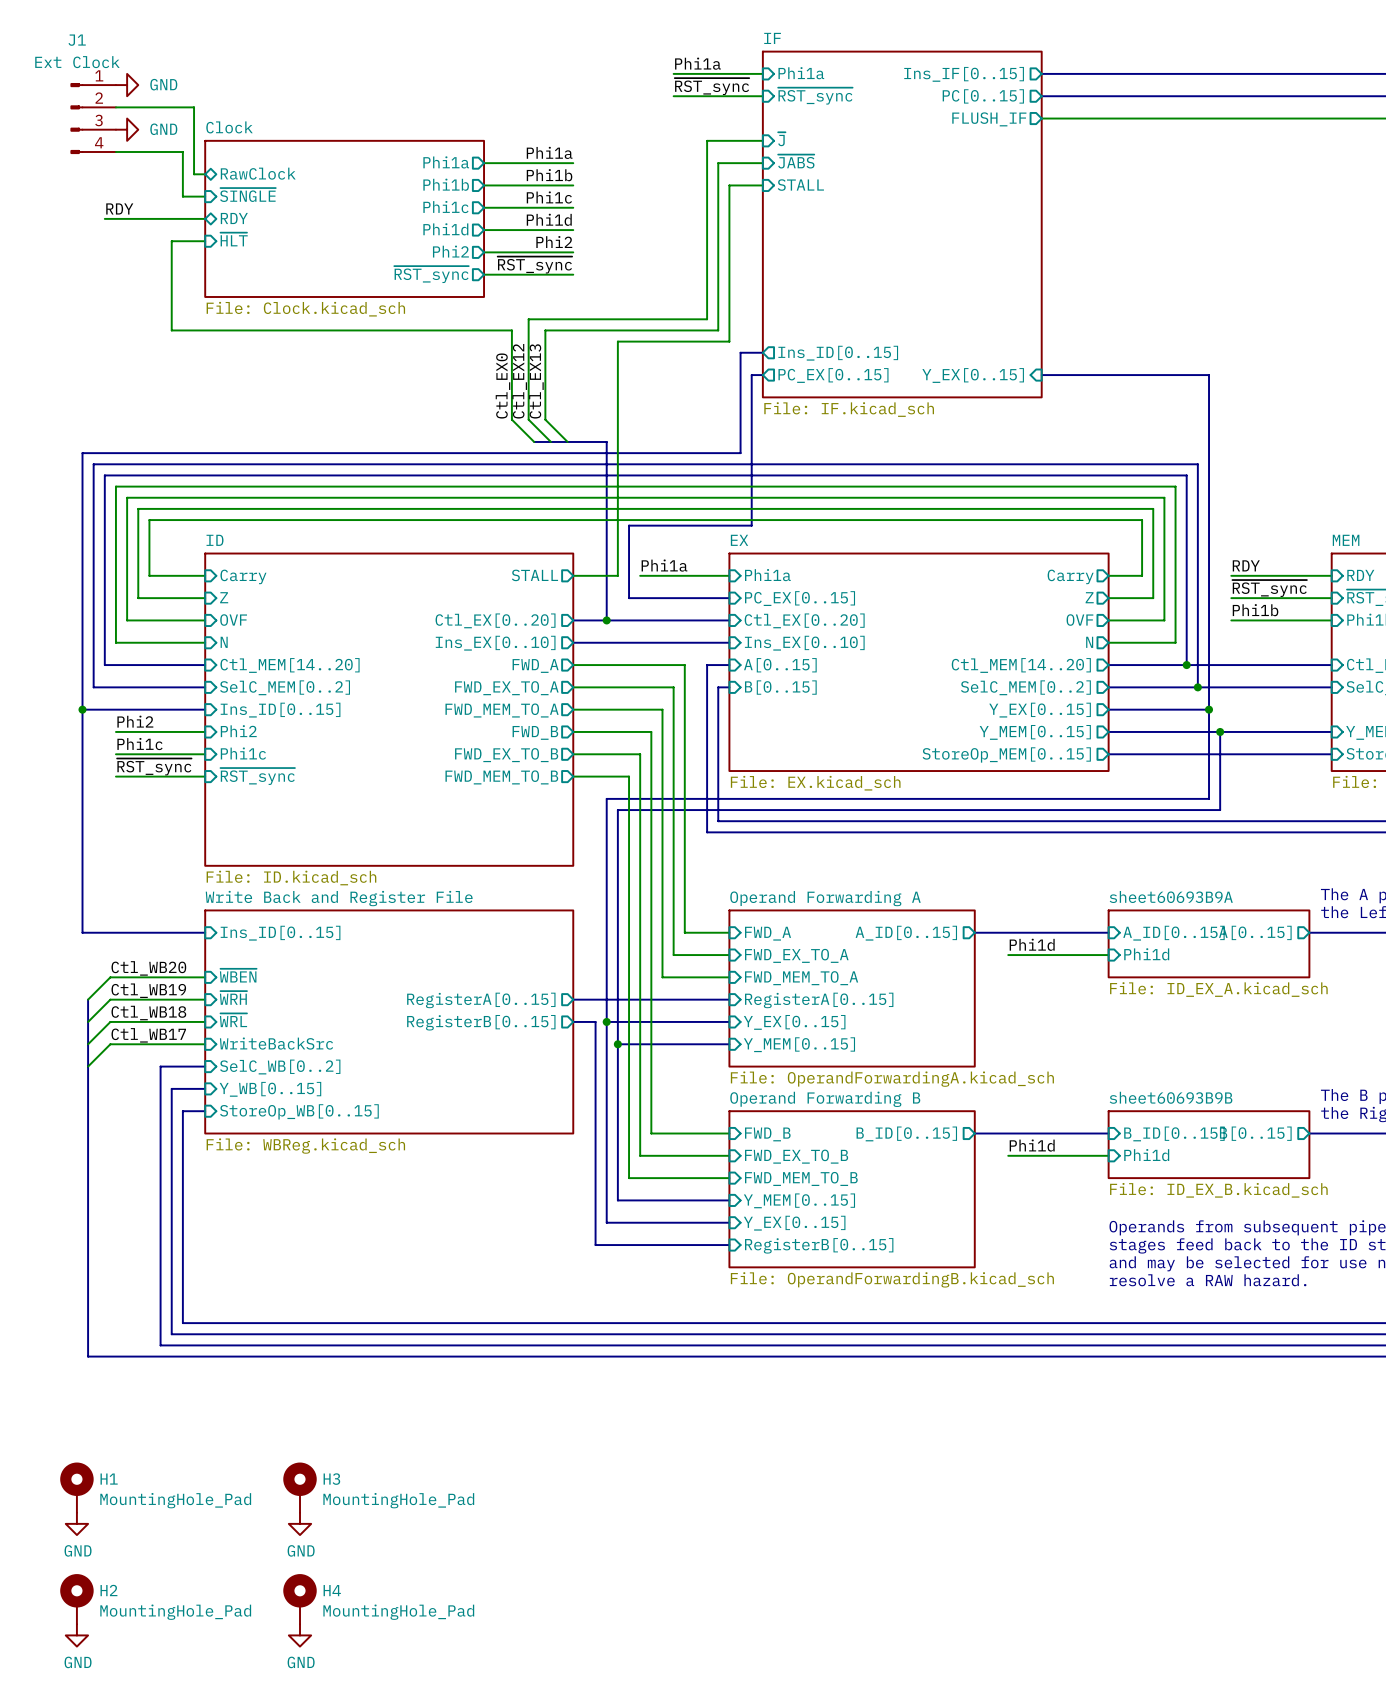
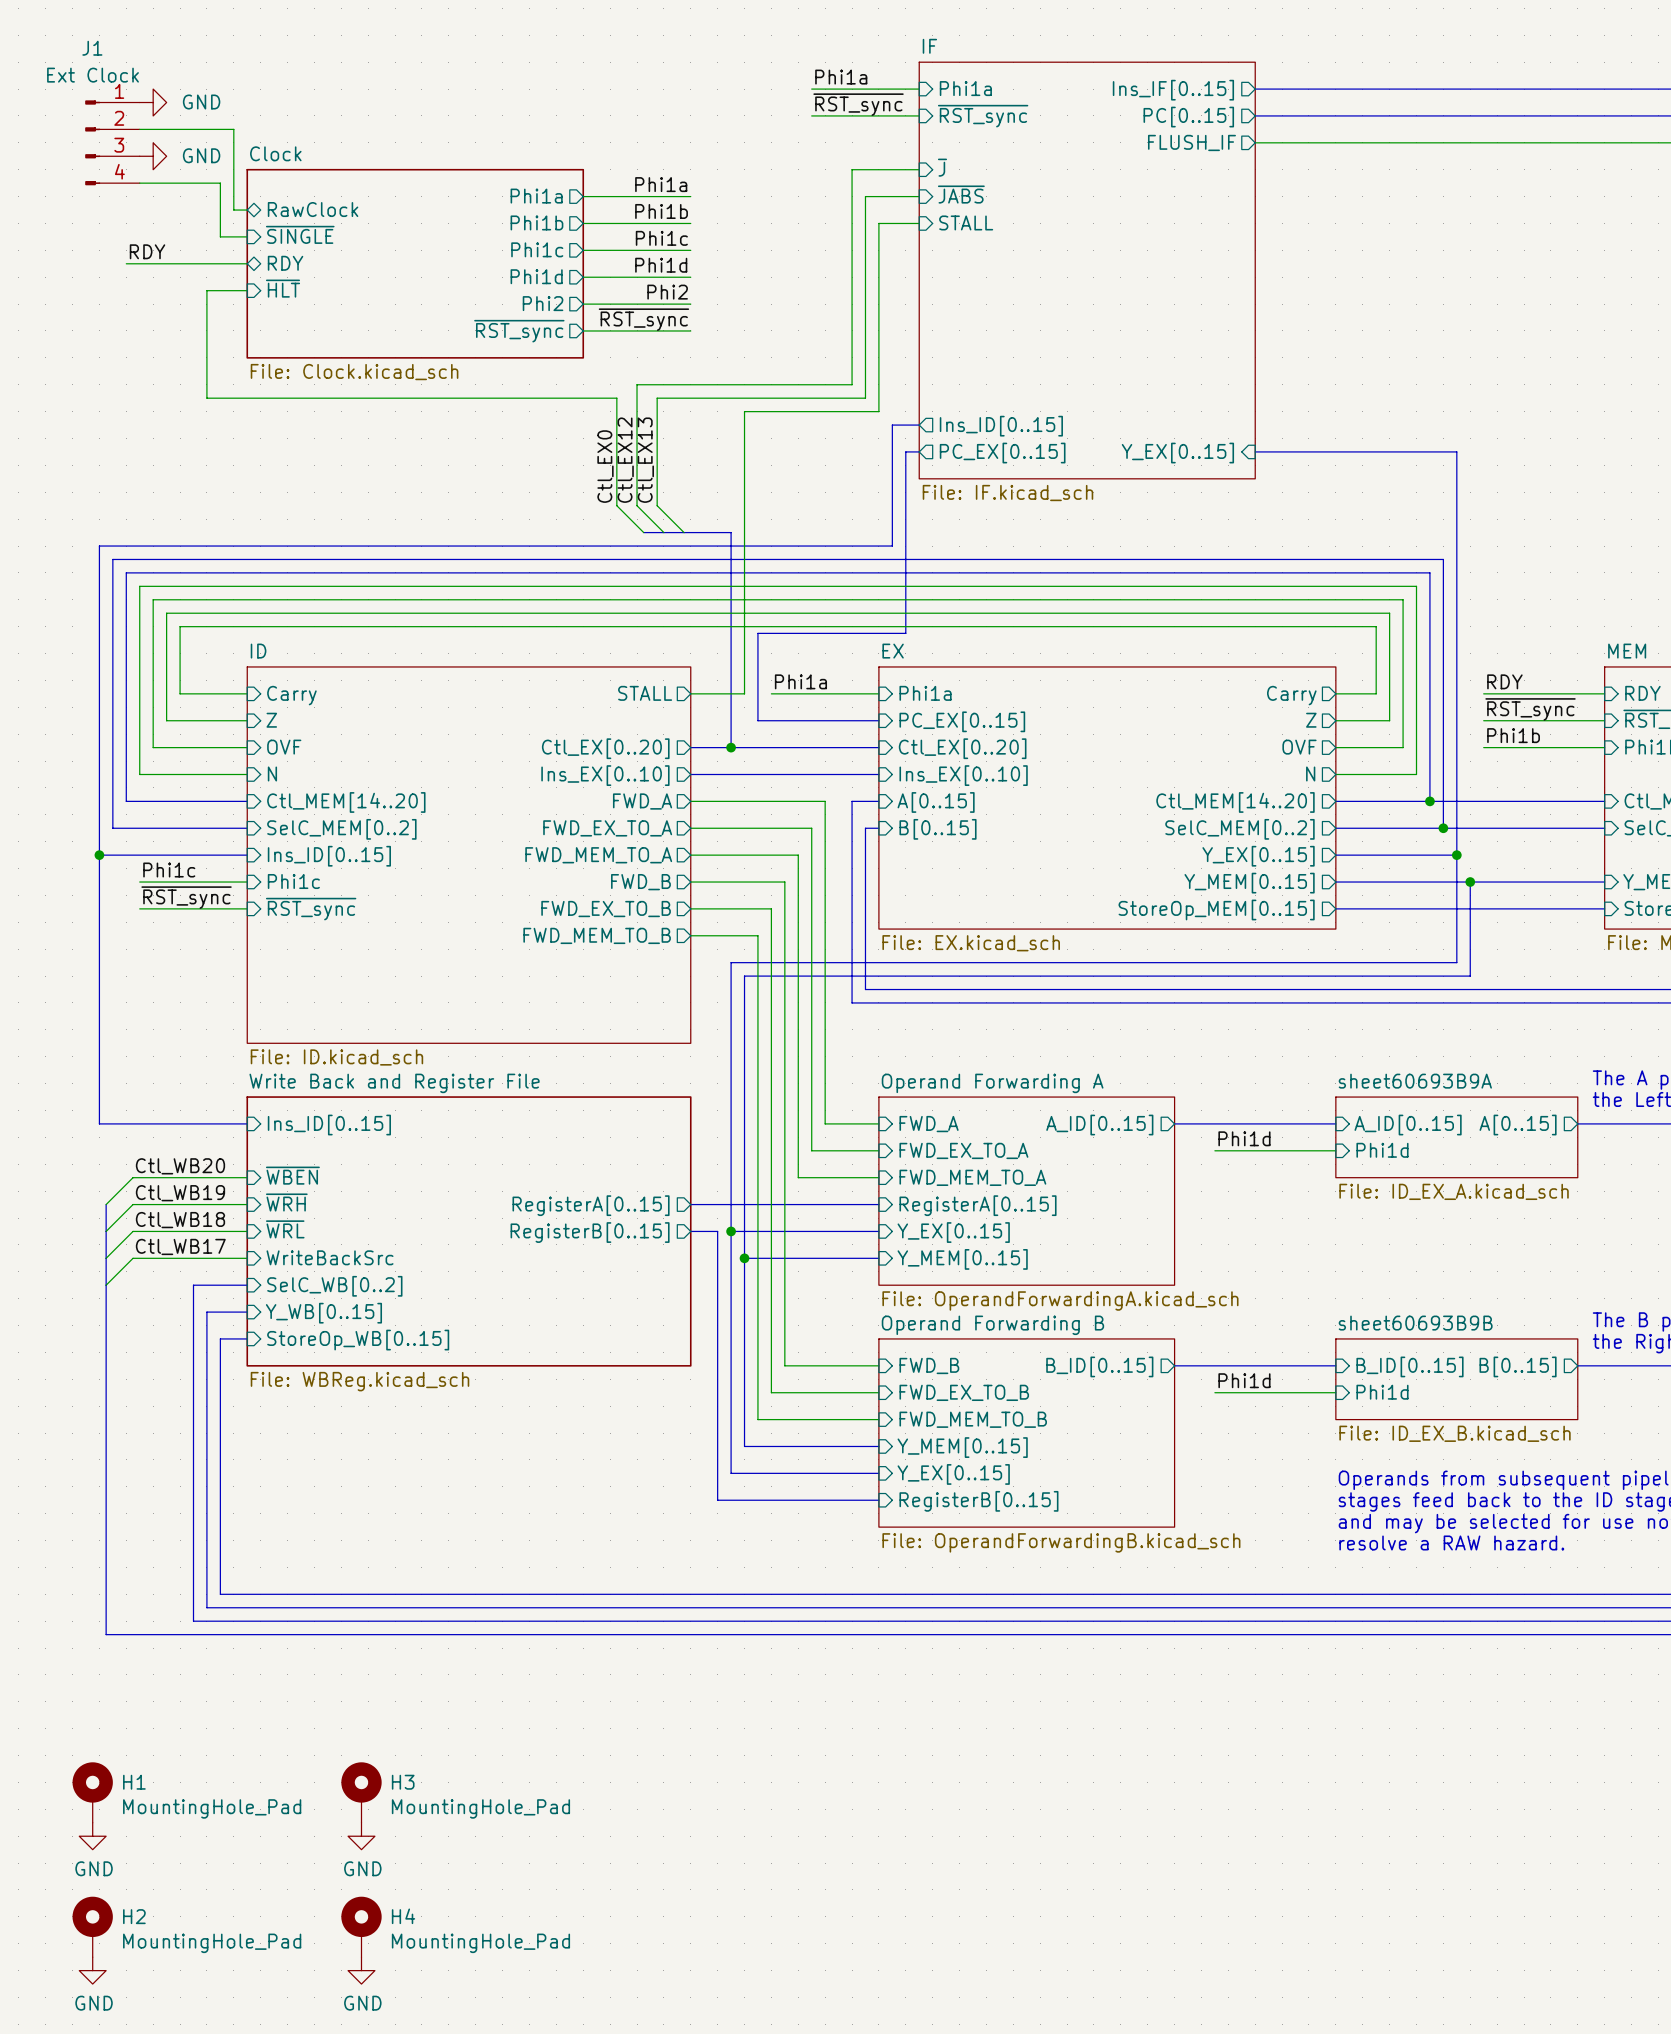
label: Phi2 (135, 721) -> Phi1c (169, 870)
sheet pin: Phi2 (238, 731) -> Phi1c (293, 881)
label: Phi1c (139, 744) -> ~{RST_sync} (186, 897)
sheet pin: Phi1c (243, 753) -> ~{RST_sync} (311, 909)
label: ~{RST_sync} (154, 766) -> none
wire: (115, 776) (205, 776) -> none
sheet pin: ~{RST_sync} (257, 776) -> none

